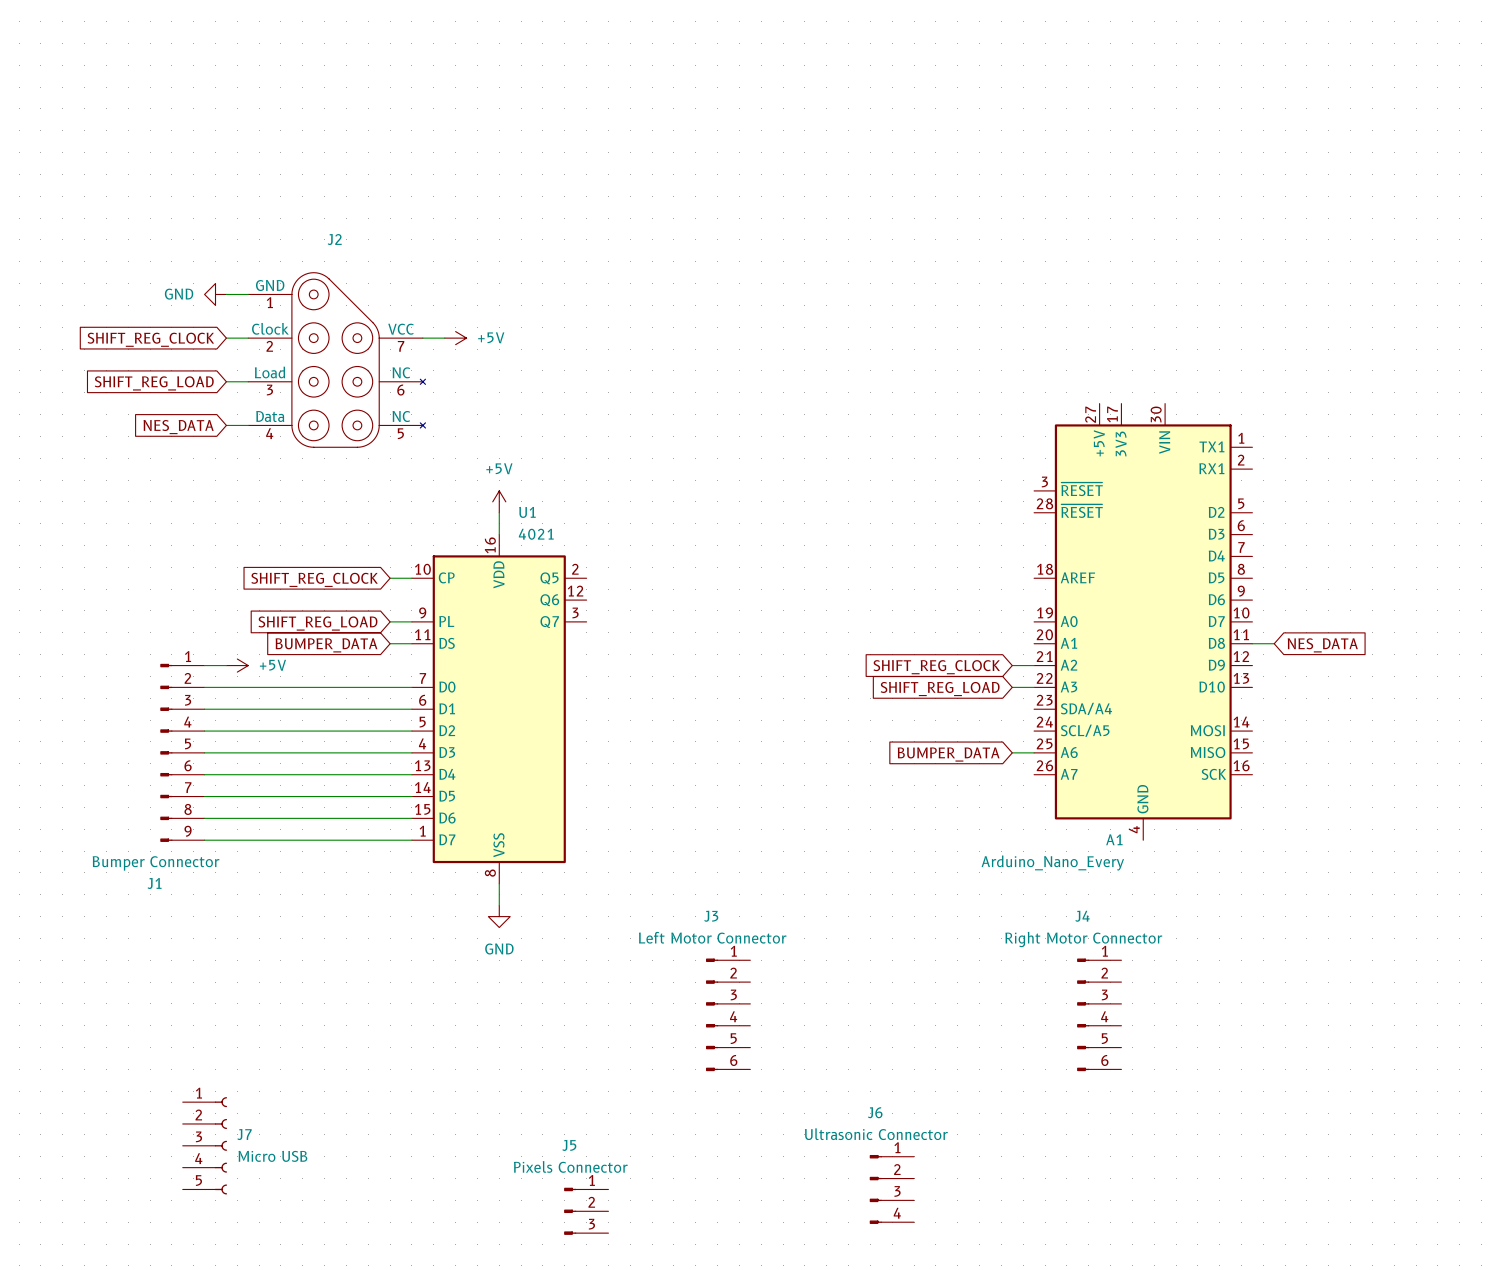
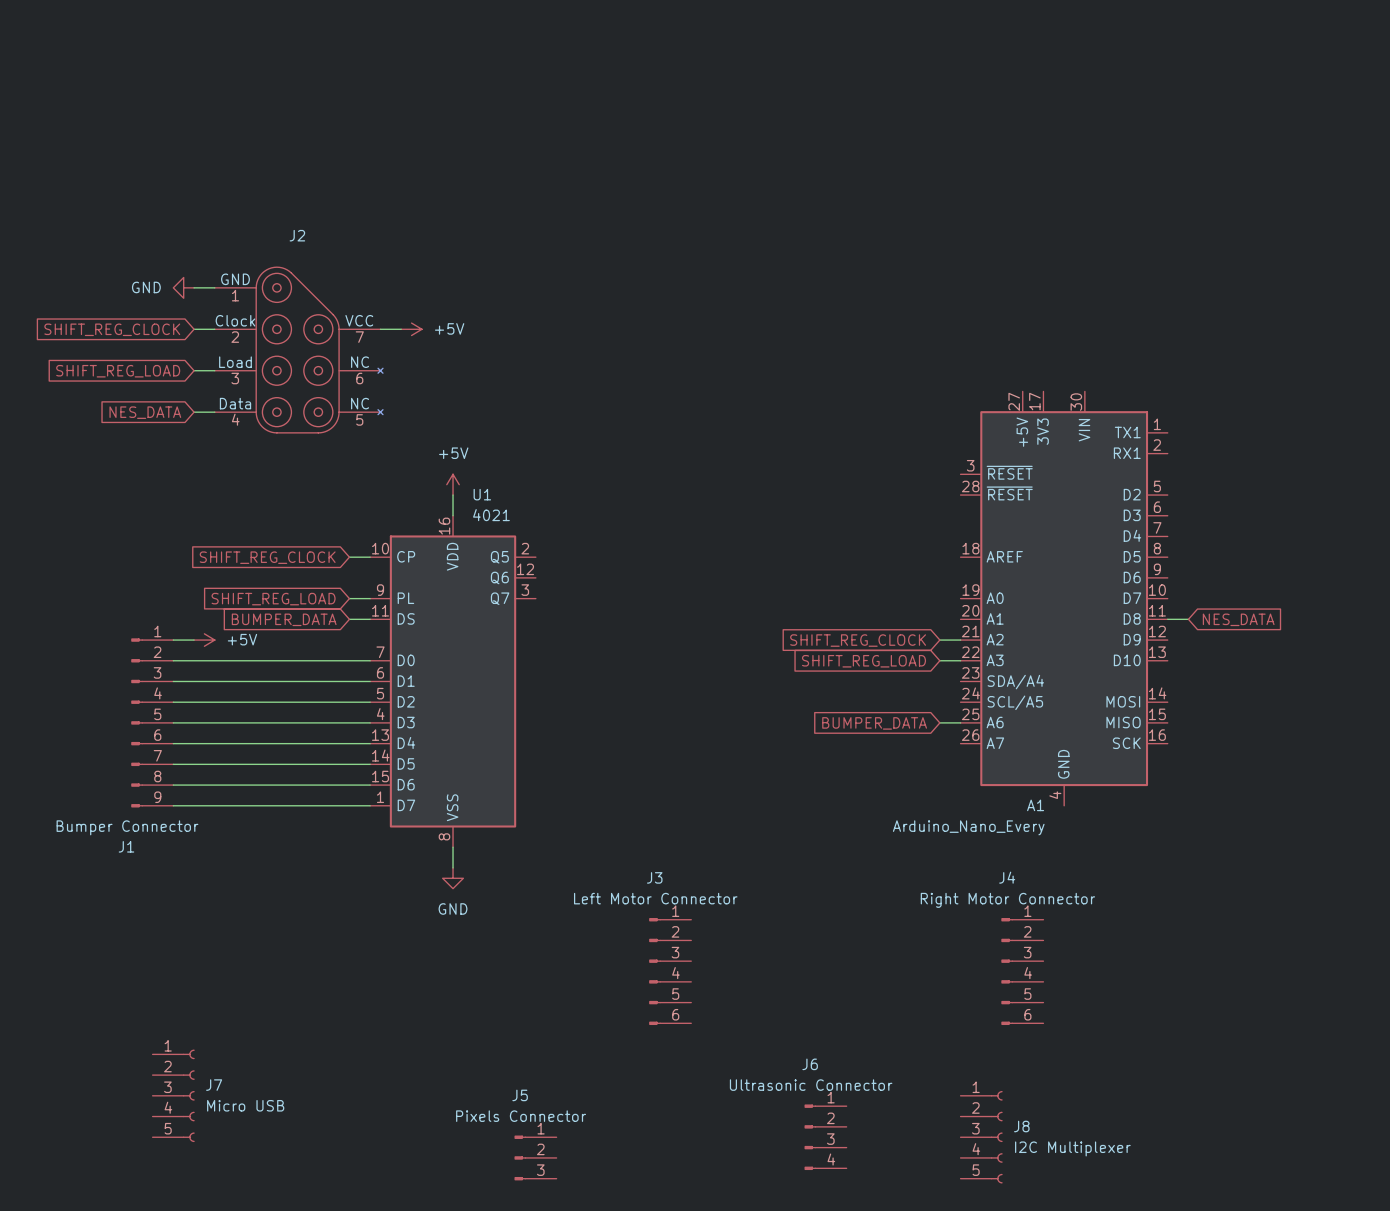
J8: none -> I2C Multiplexer (981, 1137)

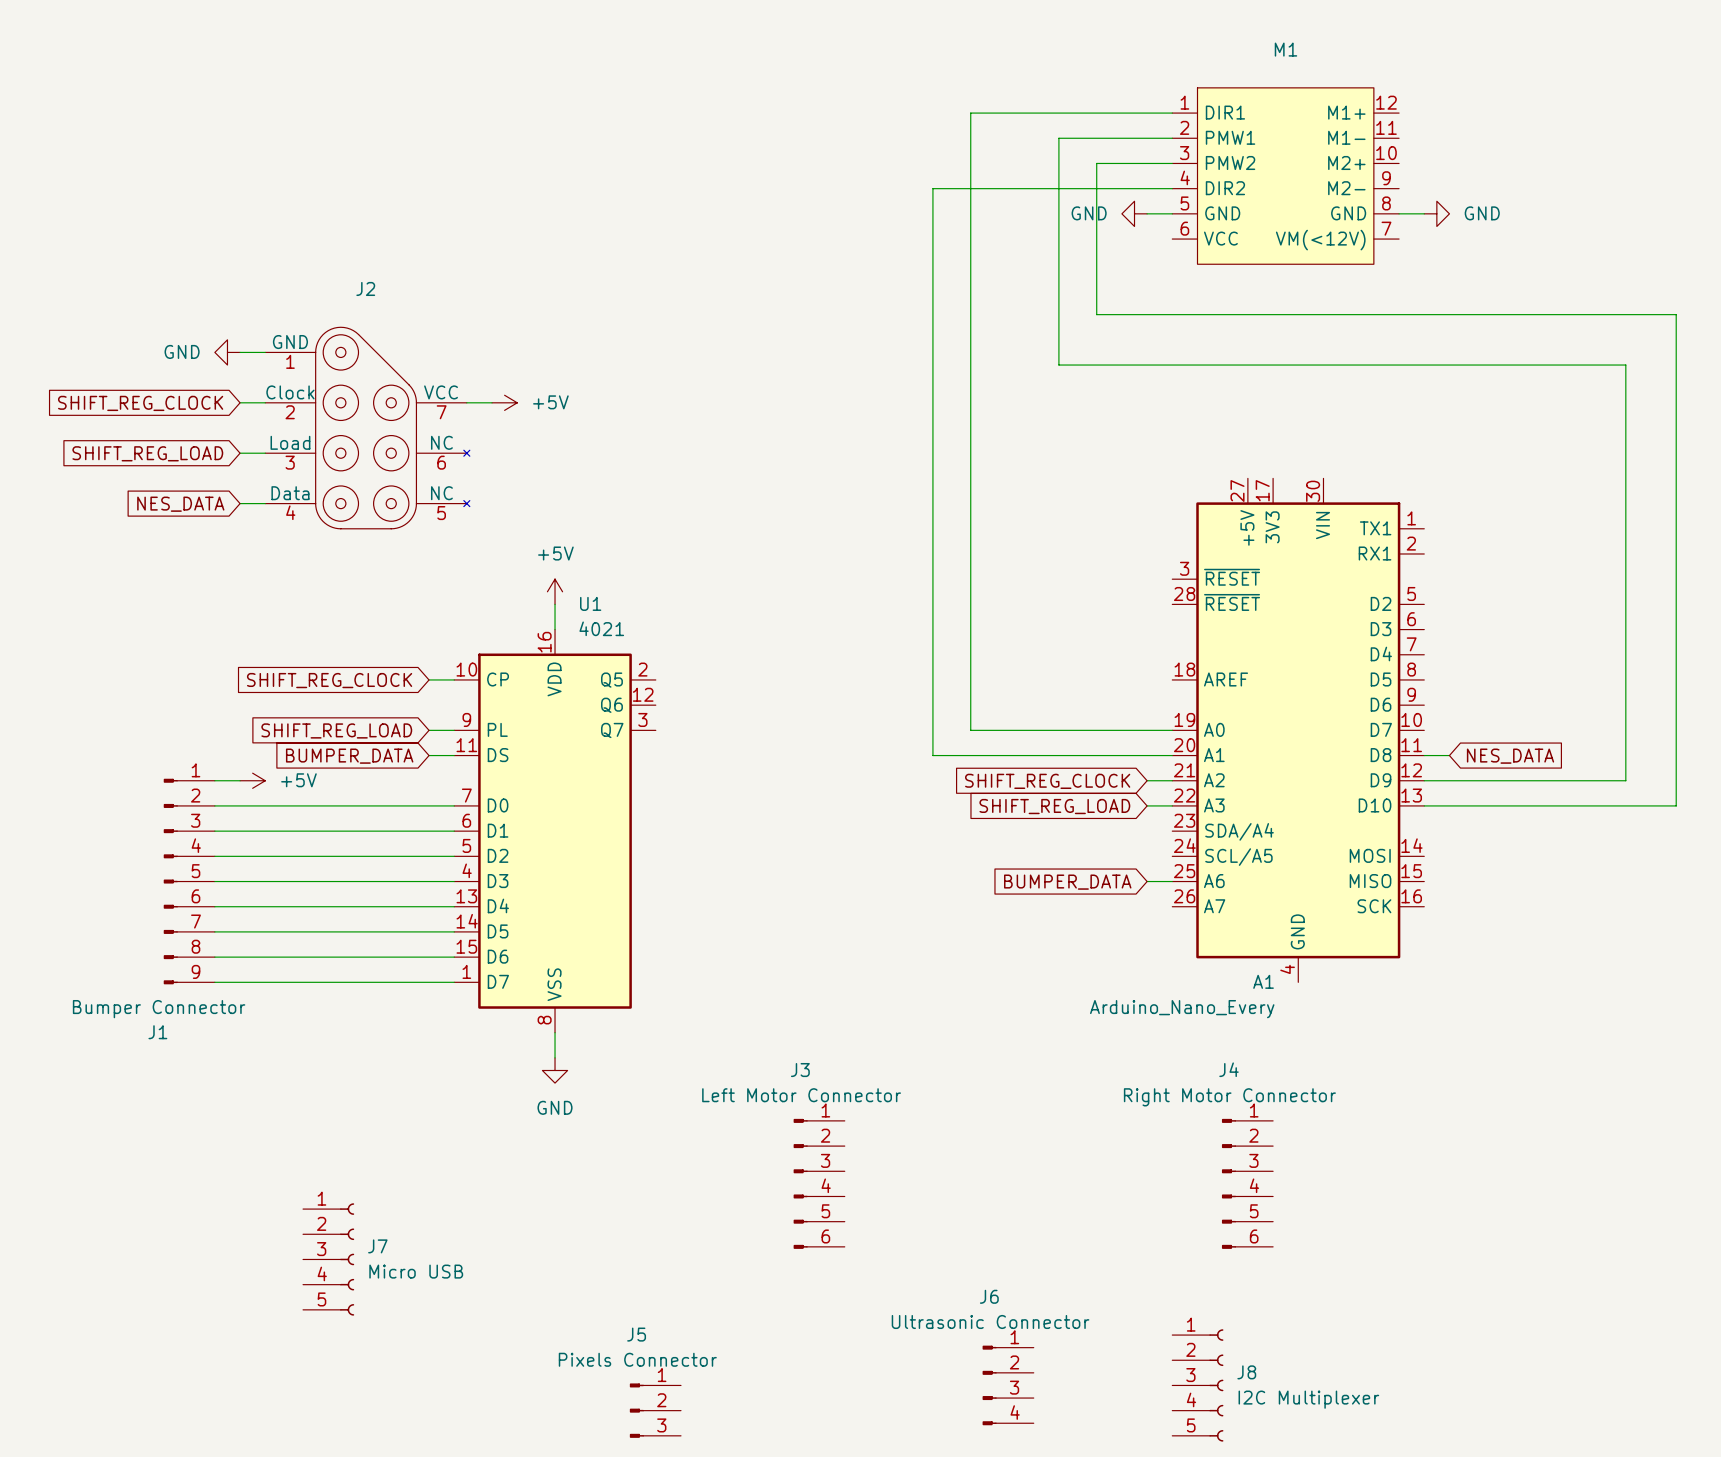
wire: none -> (1172, 113) (970, 113) (970, 730) (1172, 730)
wire: none -> (1172, 138) (1058, 138) (1058, 365) (1625, 365) (1625, 780) (1424, 780)
wire: none -> (1172, 163) (1096, 163) (1096, 314) (1676, 314) (1676, 805) (1424, 805)
M1: none -> (1285, 176)
wire: none -> (1172, 188) (932, 188) (932, 755) (1172, 755)
power symbol: none -> GND (1134, 213)
wire: none -> (1147, 213) (1172, 213)
wire: none -> (1399, 213) (1424, 213)
power symbol: none -> GND (1436, 213)
J7 position: (173, 1095) -> (328, 1259)

